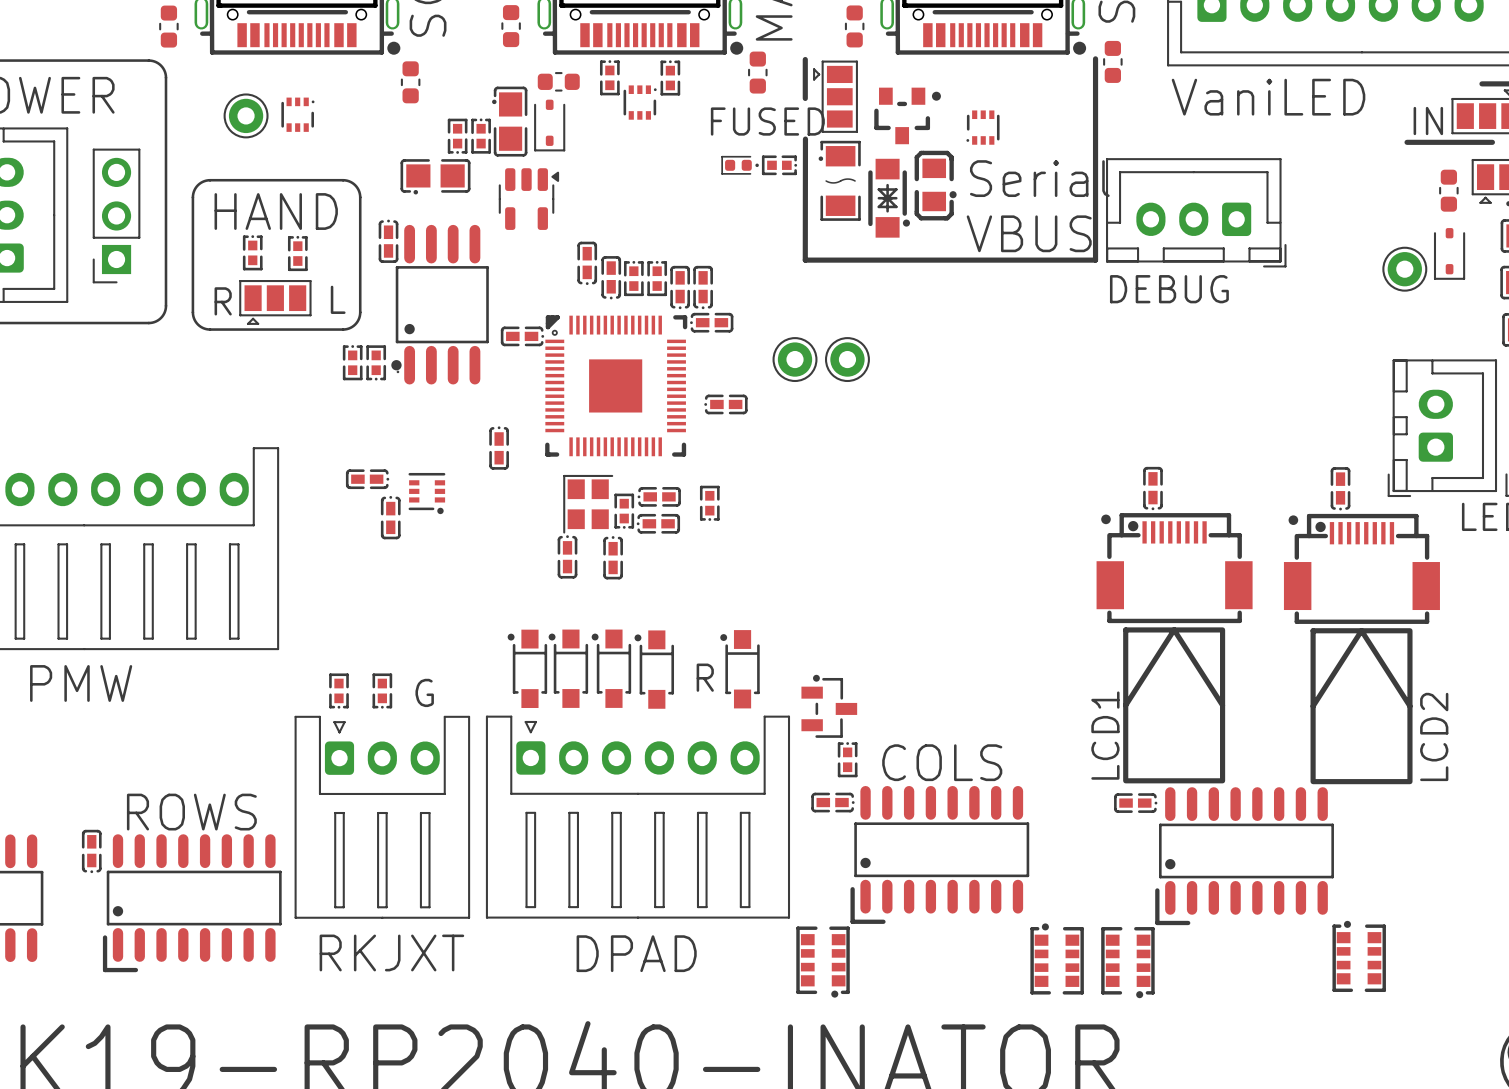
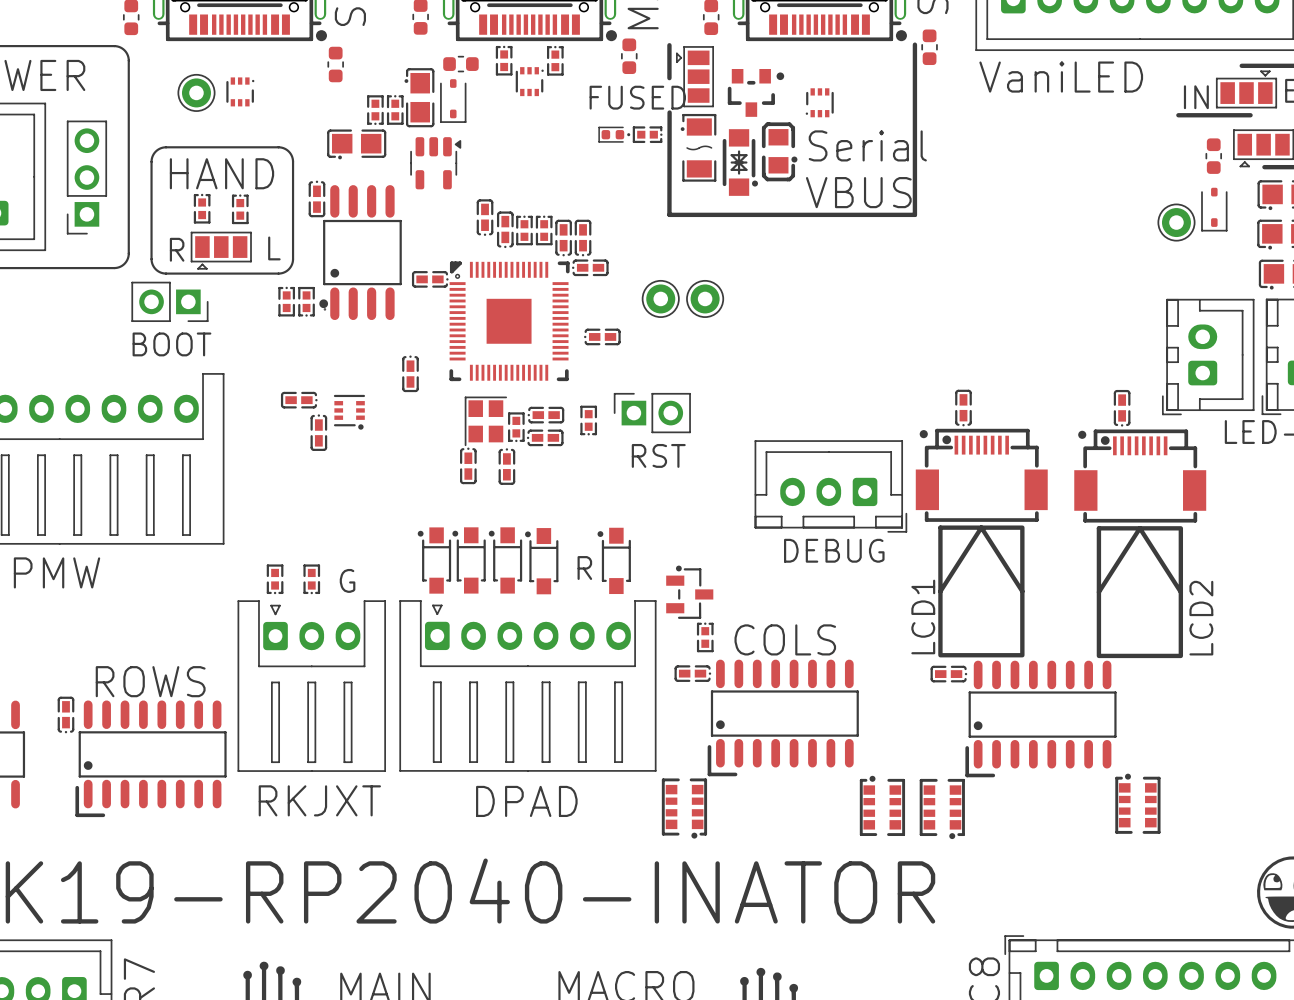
part position: (1196, 212) -> (830, 486)
text position: DEBUG (1169, 289) -> DEBUG (834, 550)
part: none -> (169, 301)
text: none -> BOOT (171, 344)
part: none -> (652, 413)
text: none -> RST (658, 455)

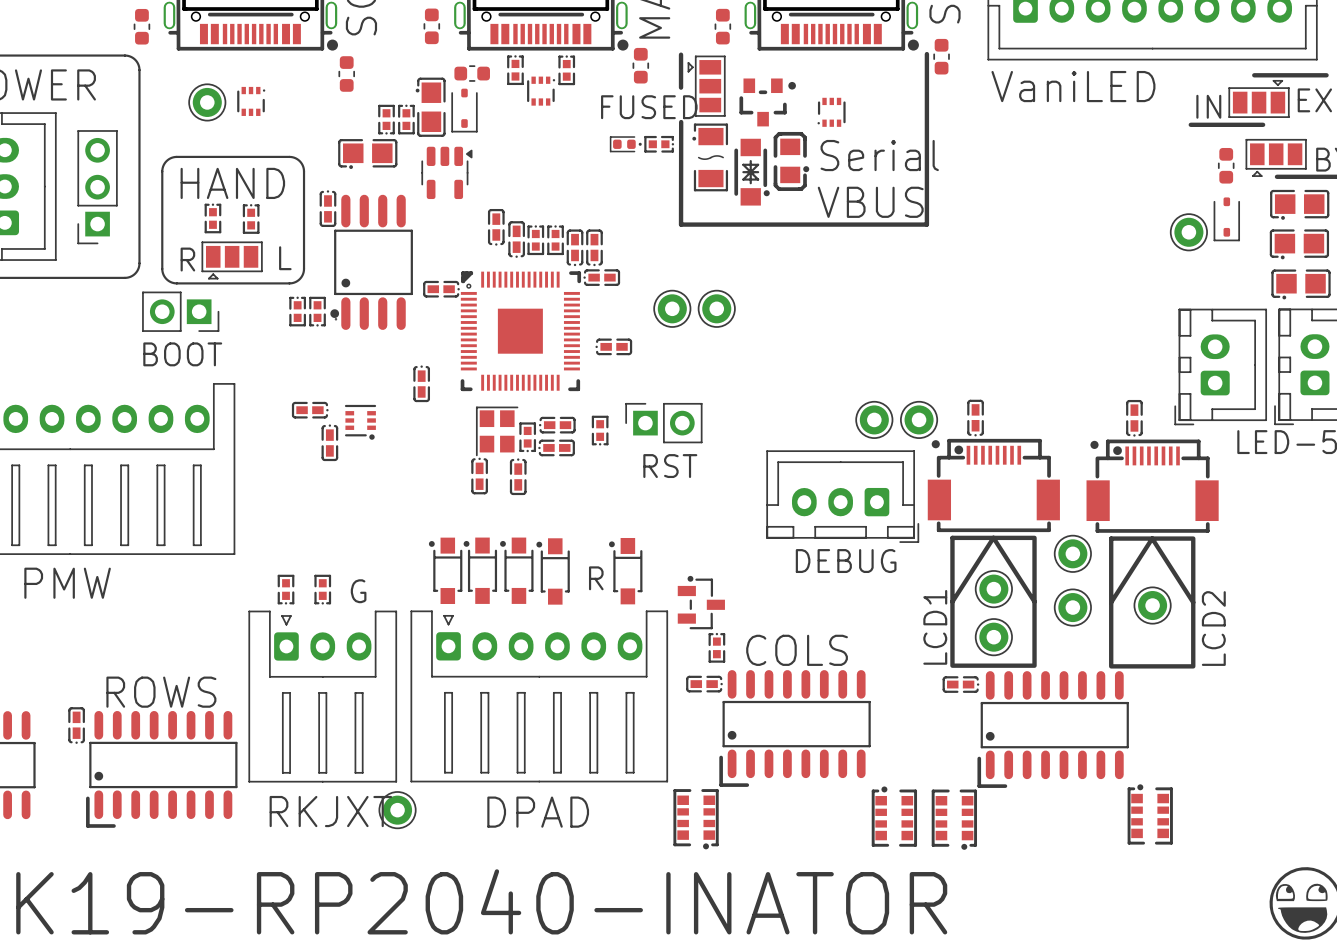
part: none -> (874, 419)
part: none -> (919, 419)
part: none -> (1072, 553)
part: none -> (993, 589)
part: none -> (1152, 605)
part: none -> (1072, 607)
part: none -> (993, 637)
part: none -> (397, 810)

